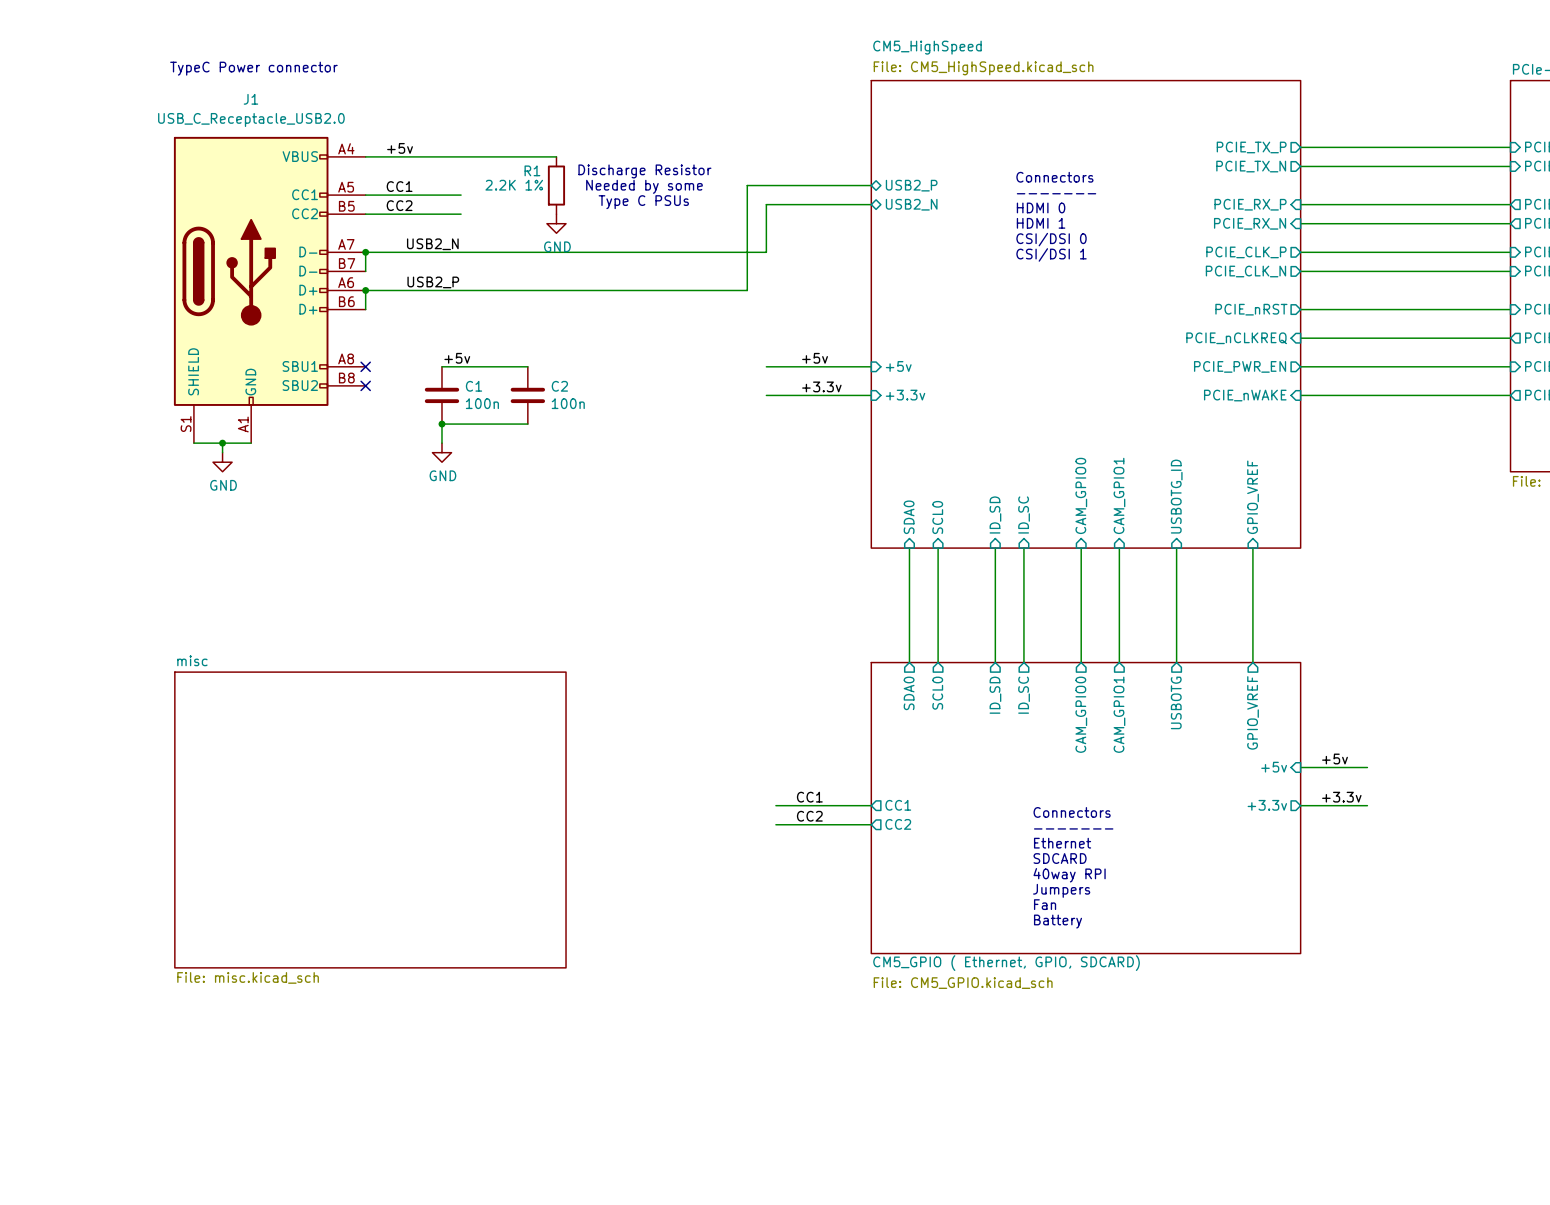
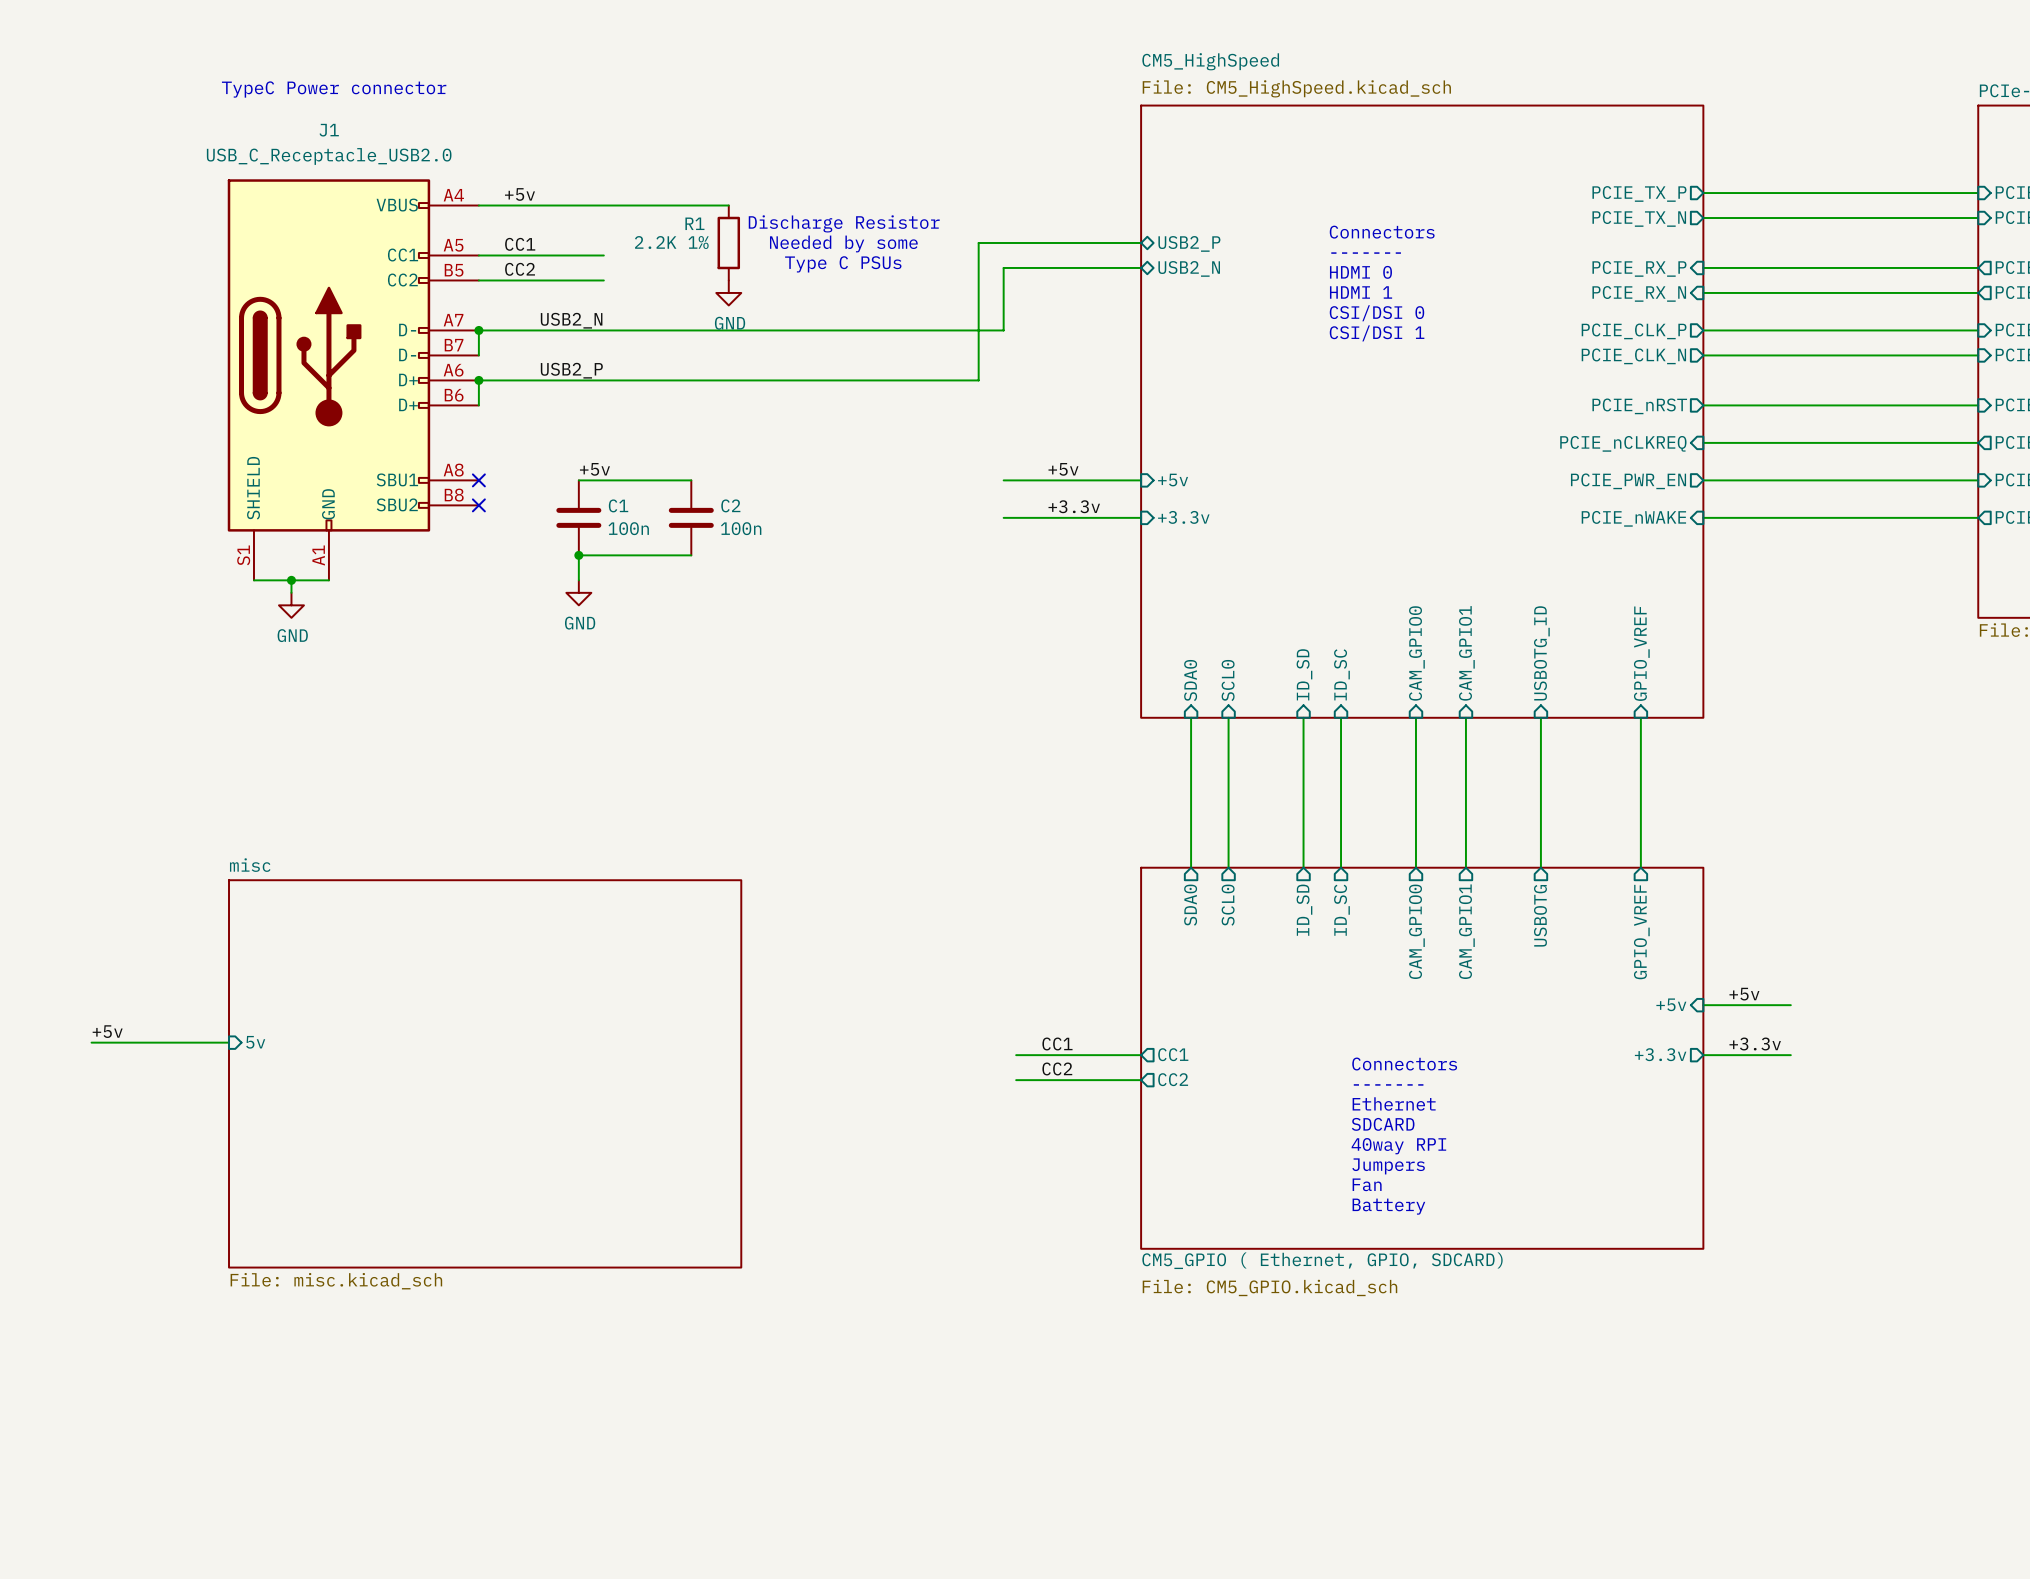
label: none -> +5v (107, 1031)
sheet pin: none -> 5v (255, 1042)
wire: none -> (91, 1042) (229, 1042)

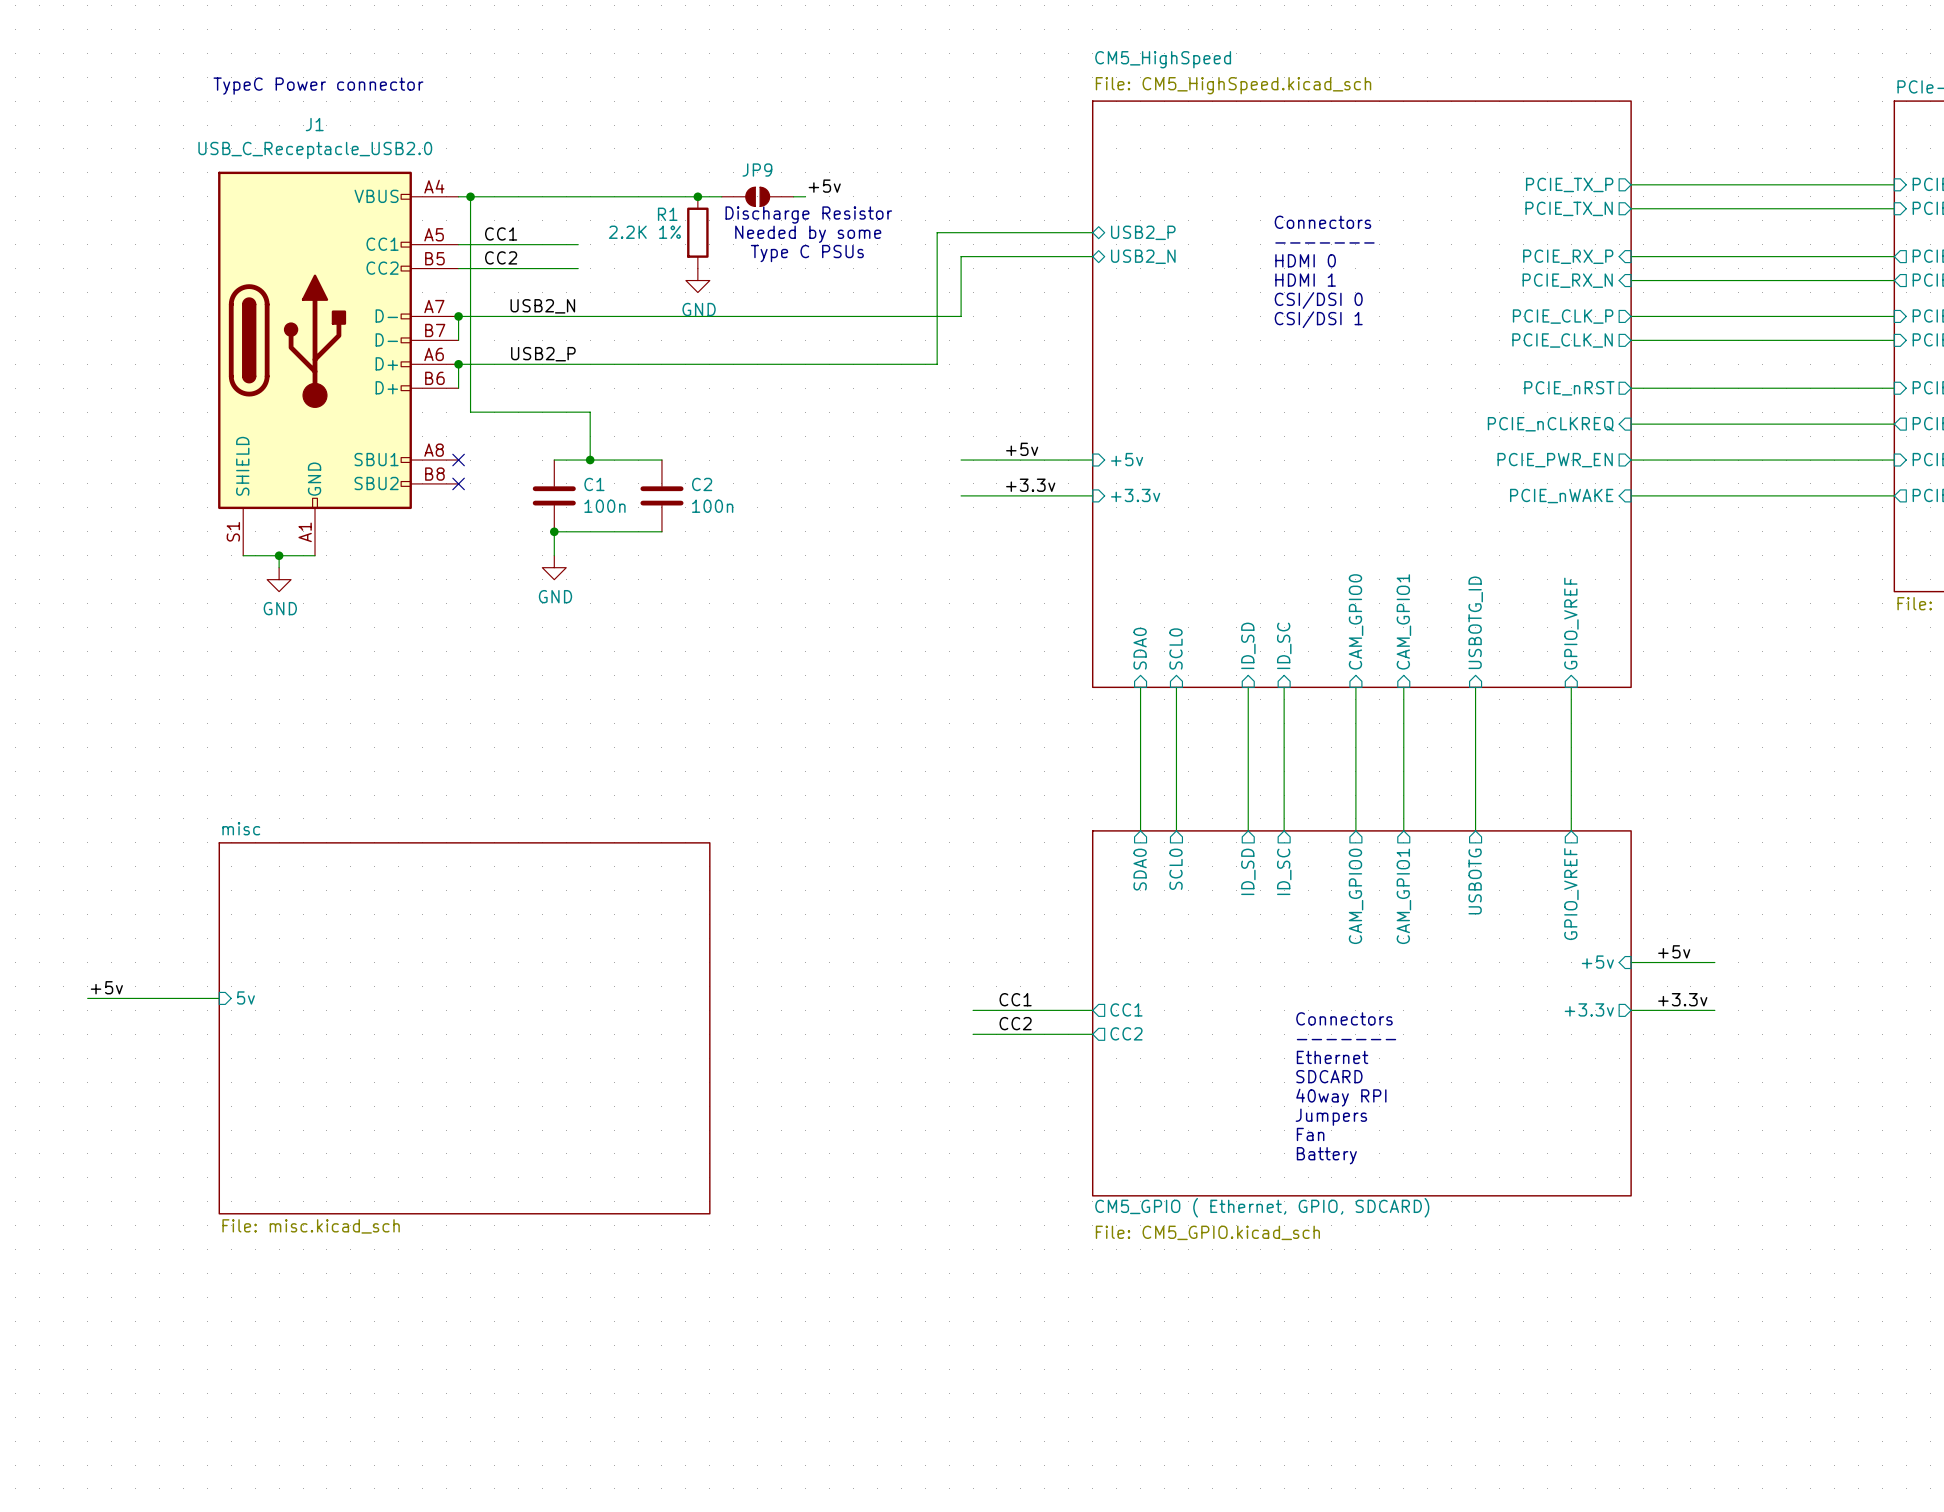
label: +5v (519, 194) -> none
label: none -> +5v (824, 186)
wire: none -> (470, 196) (470, 412) (590, 412) (590, 460)
junction: none -> (470, 196)
wire: none -> (697, 196) (721, 196)
junction: none -> (697, 196)
JP9: none -> (757, 196)
wire: none -> (793, 196) (805, 196)
label: +5v (594, 469) -> none
junction: none -> (590, 460)

